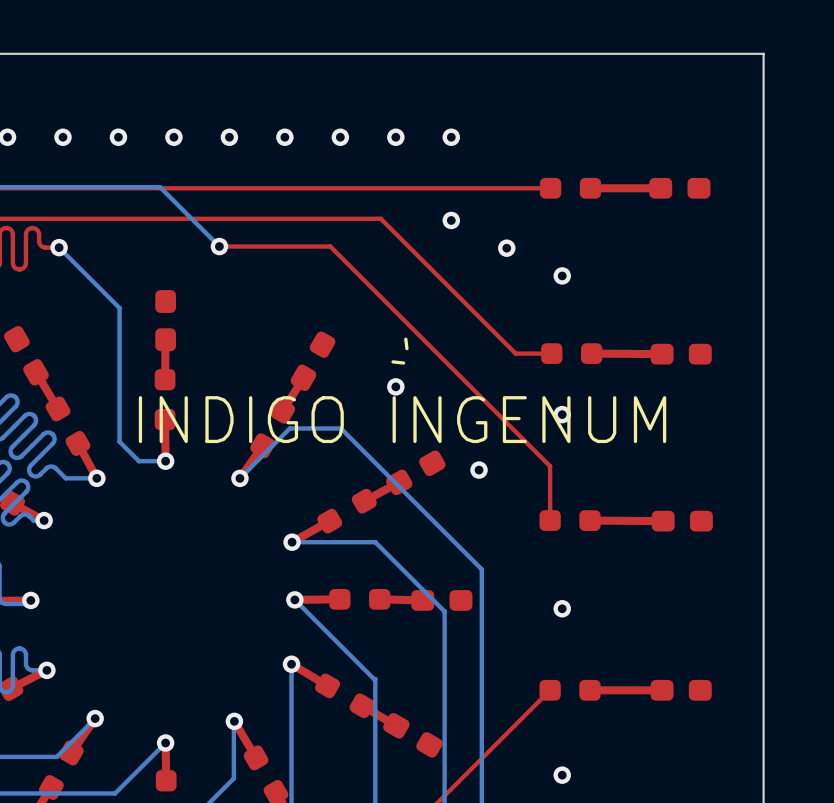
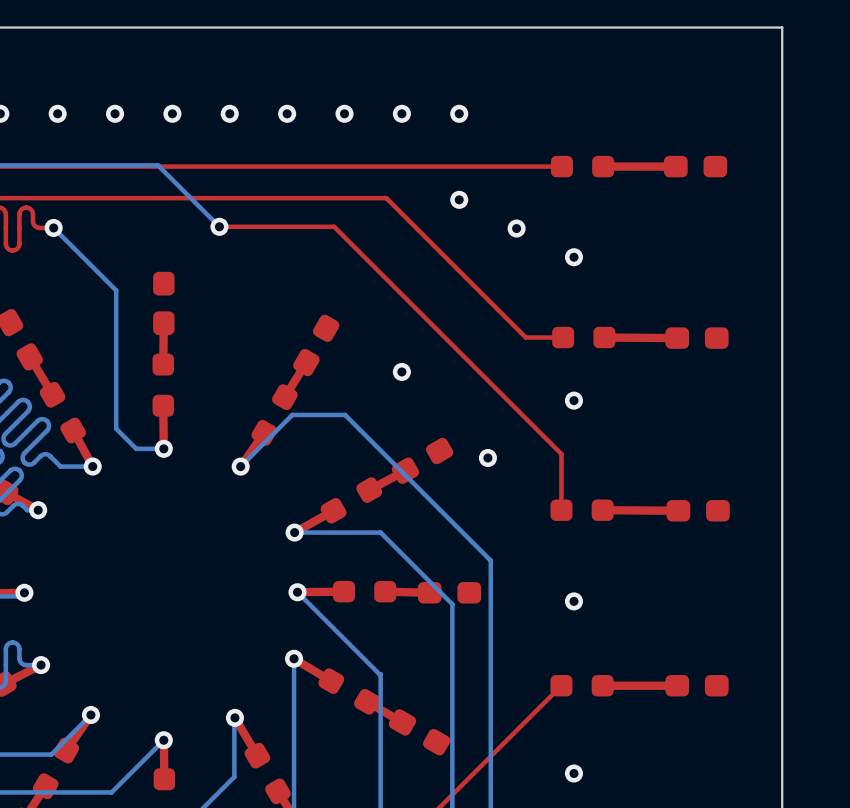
line: (405, 339) (406, 348) -> none
line: (393, 361) (403, 363) -> none
text: INDIGO INGENUM (402, 419) -> none

